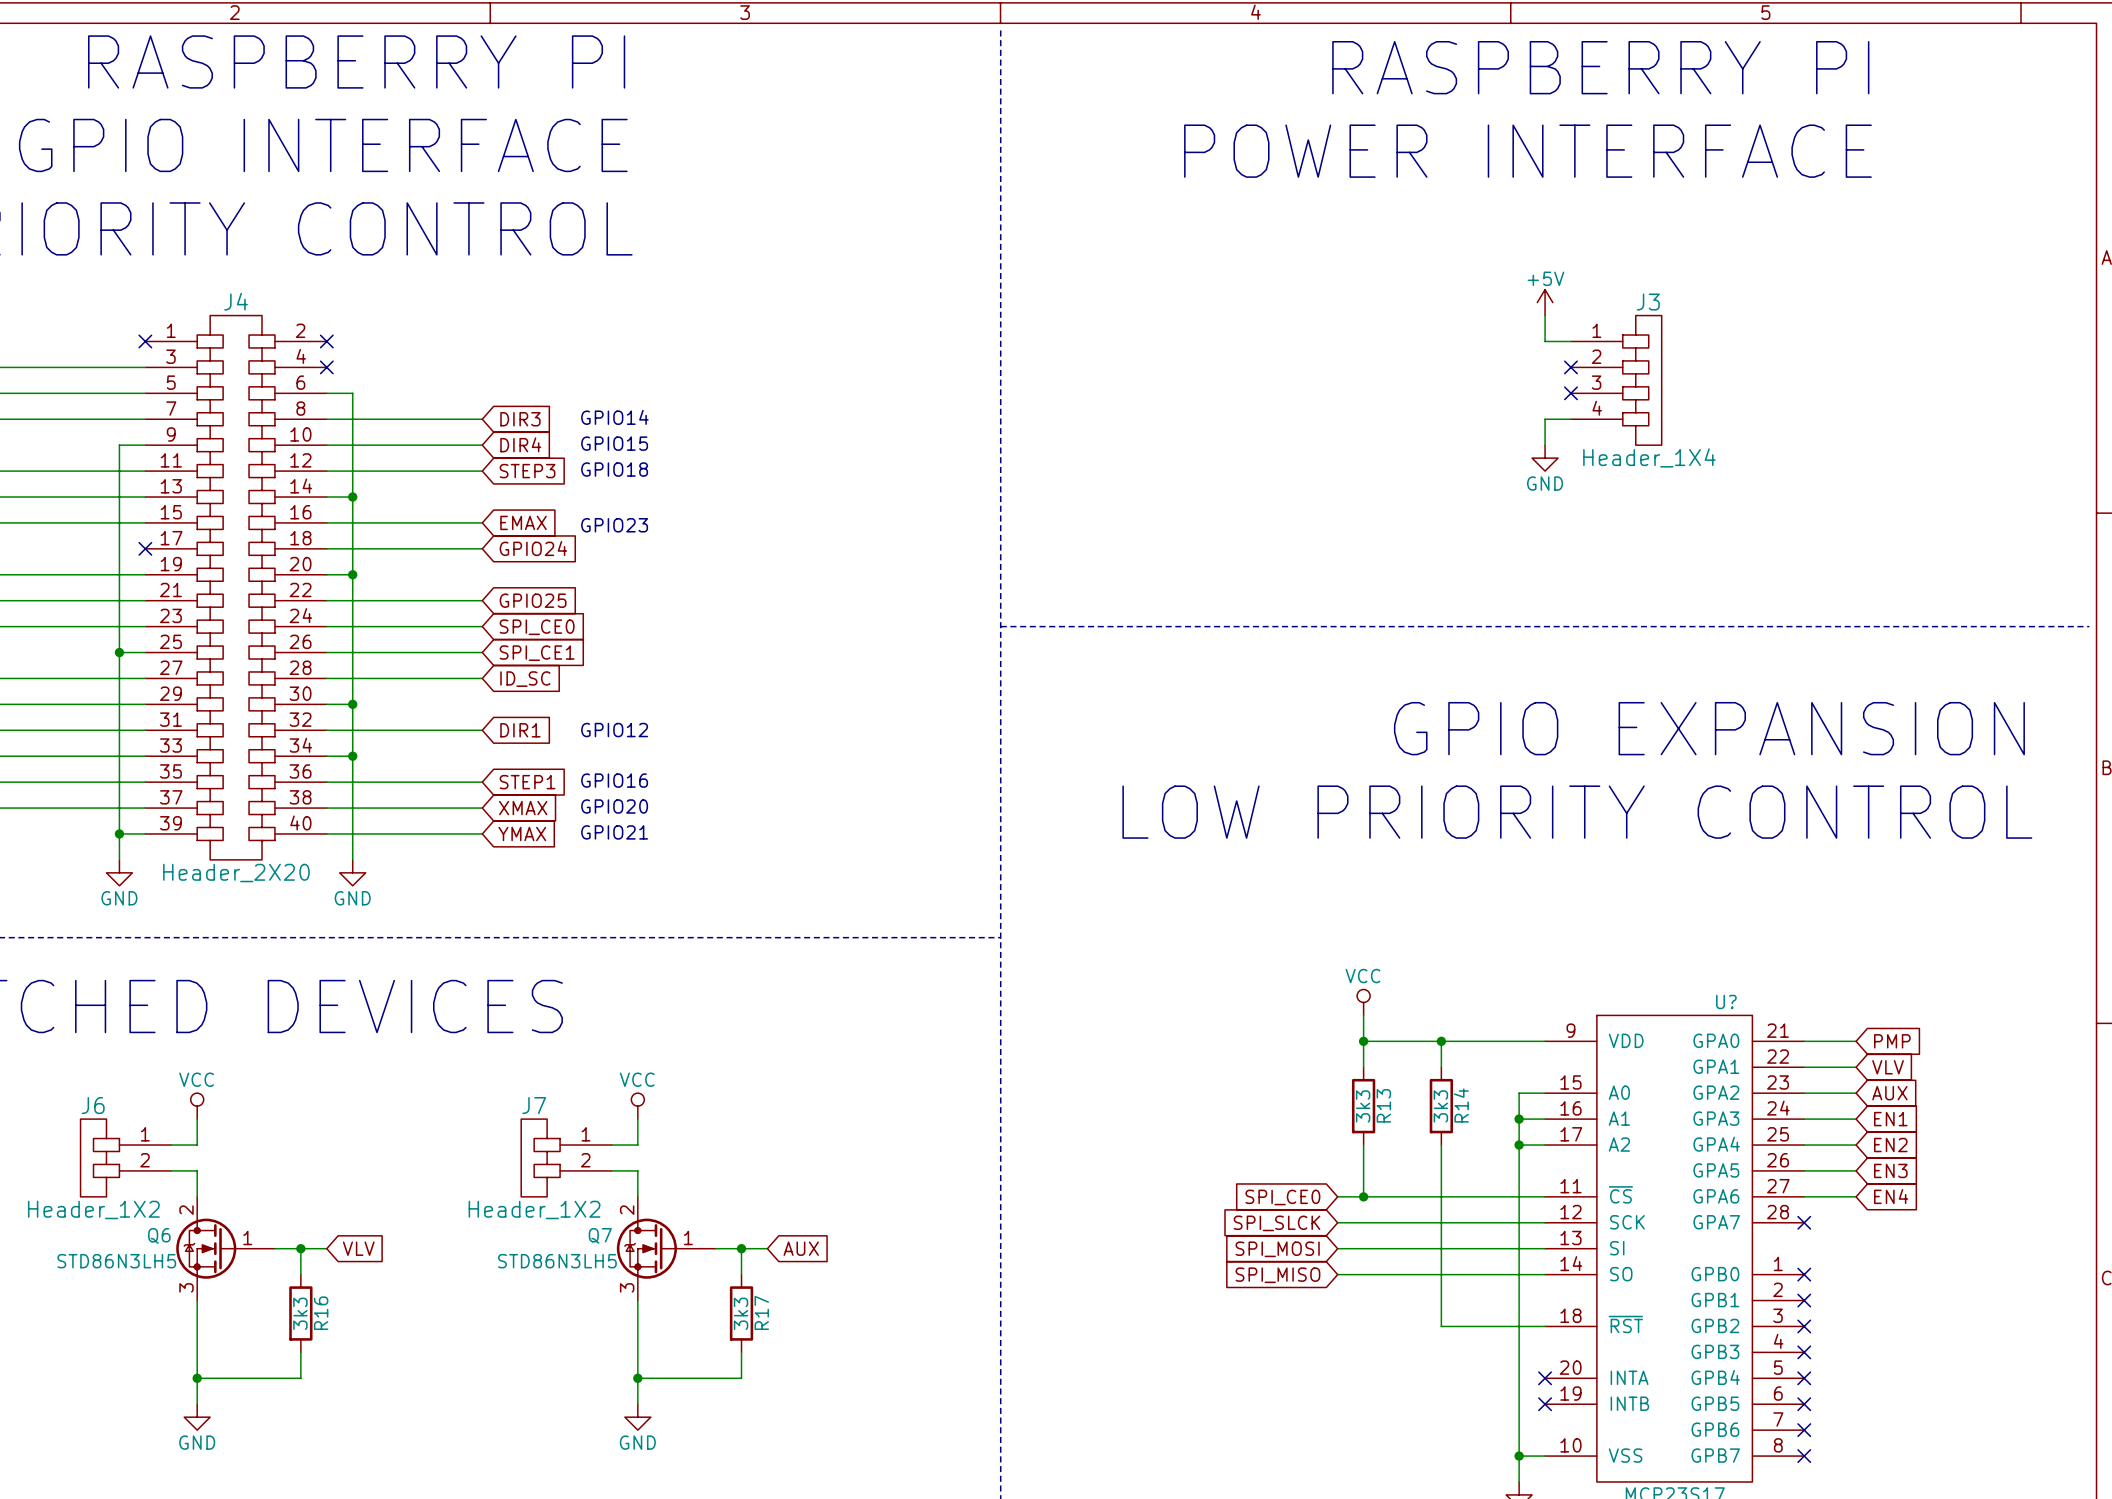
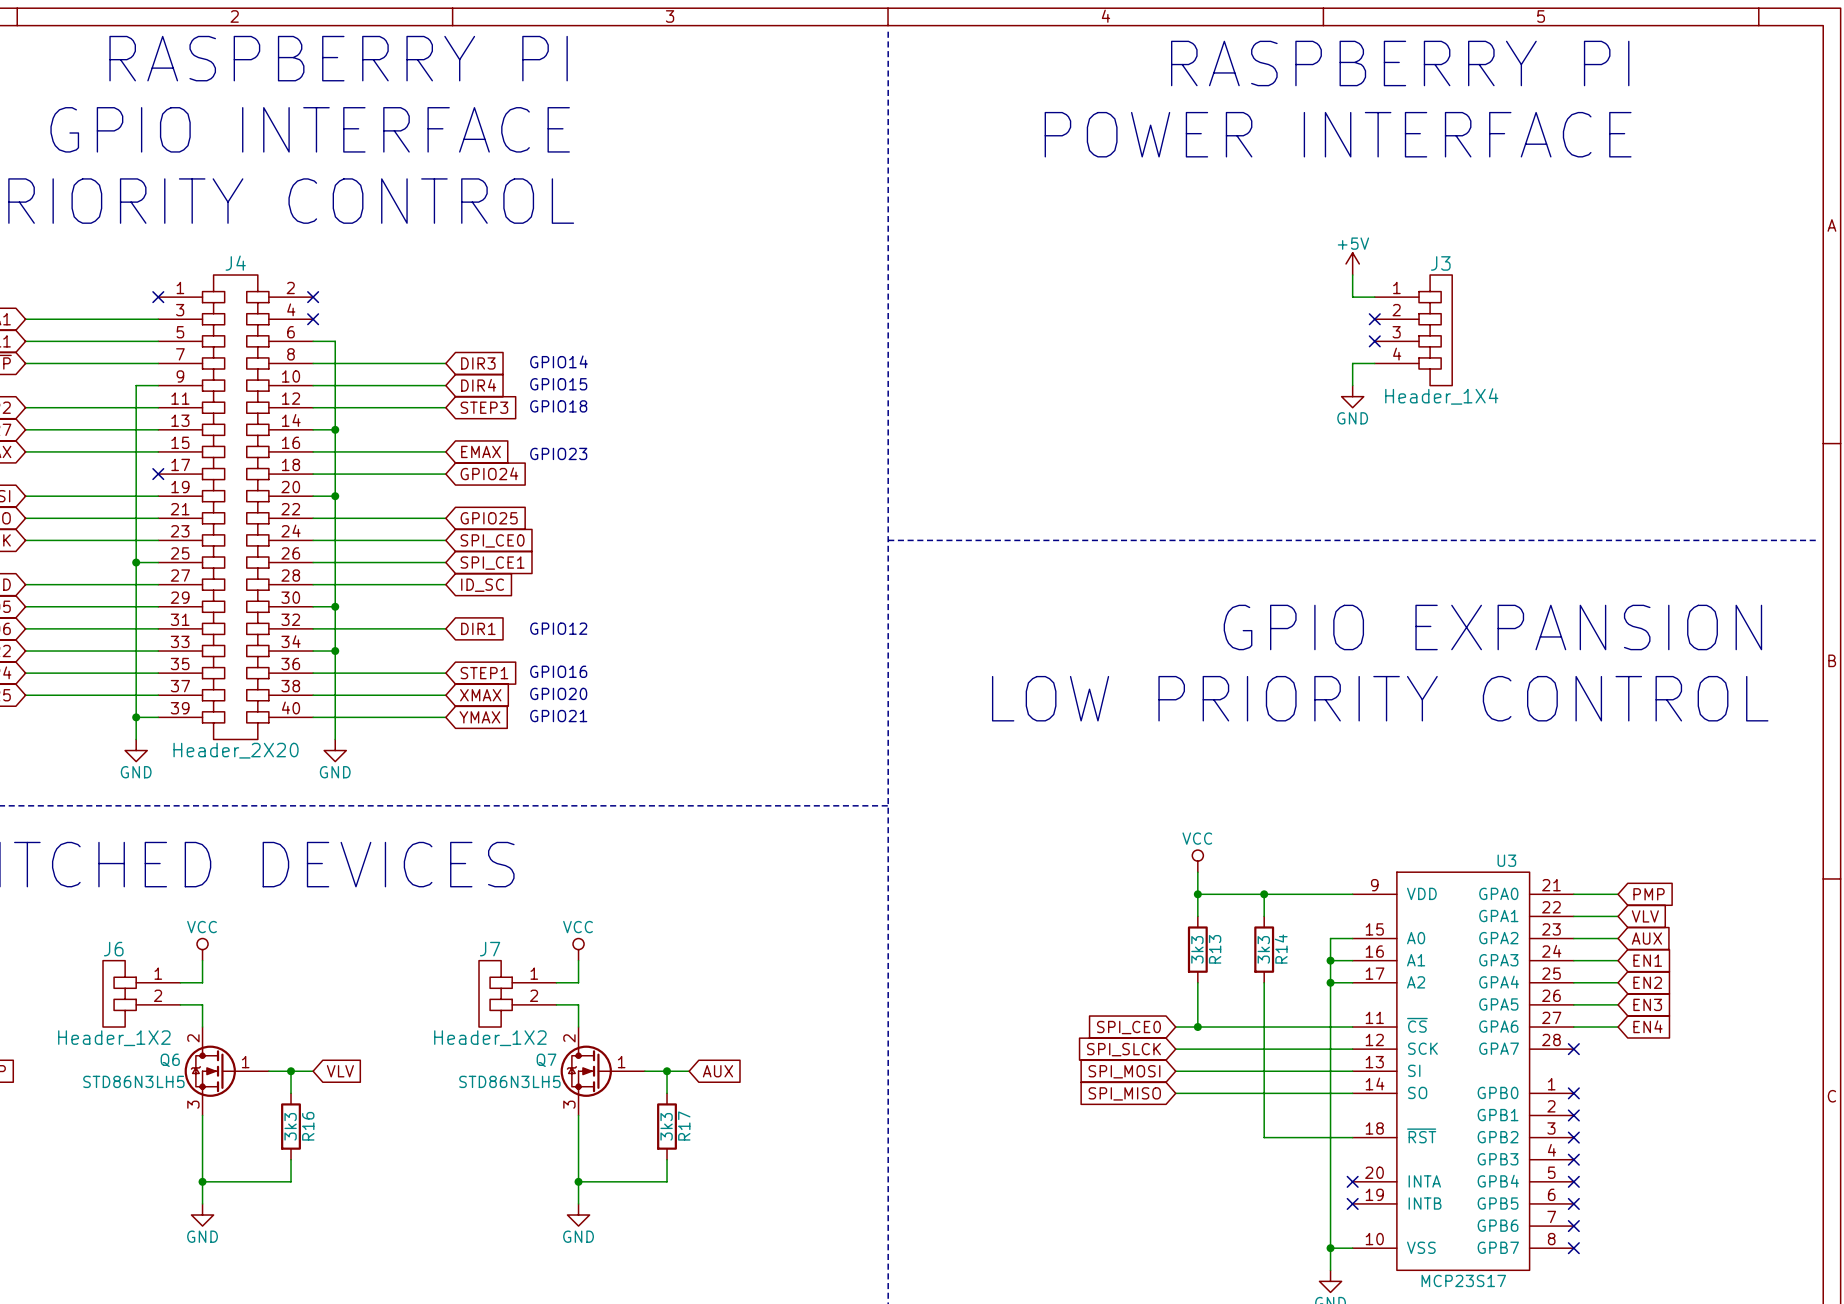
U? name: U? (1726, 1001) -> U3 (1506, 860)

